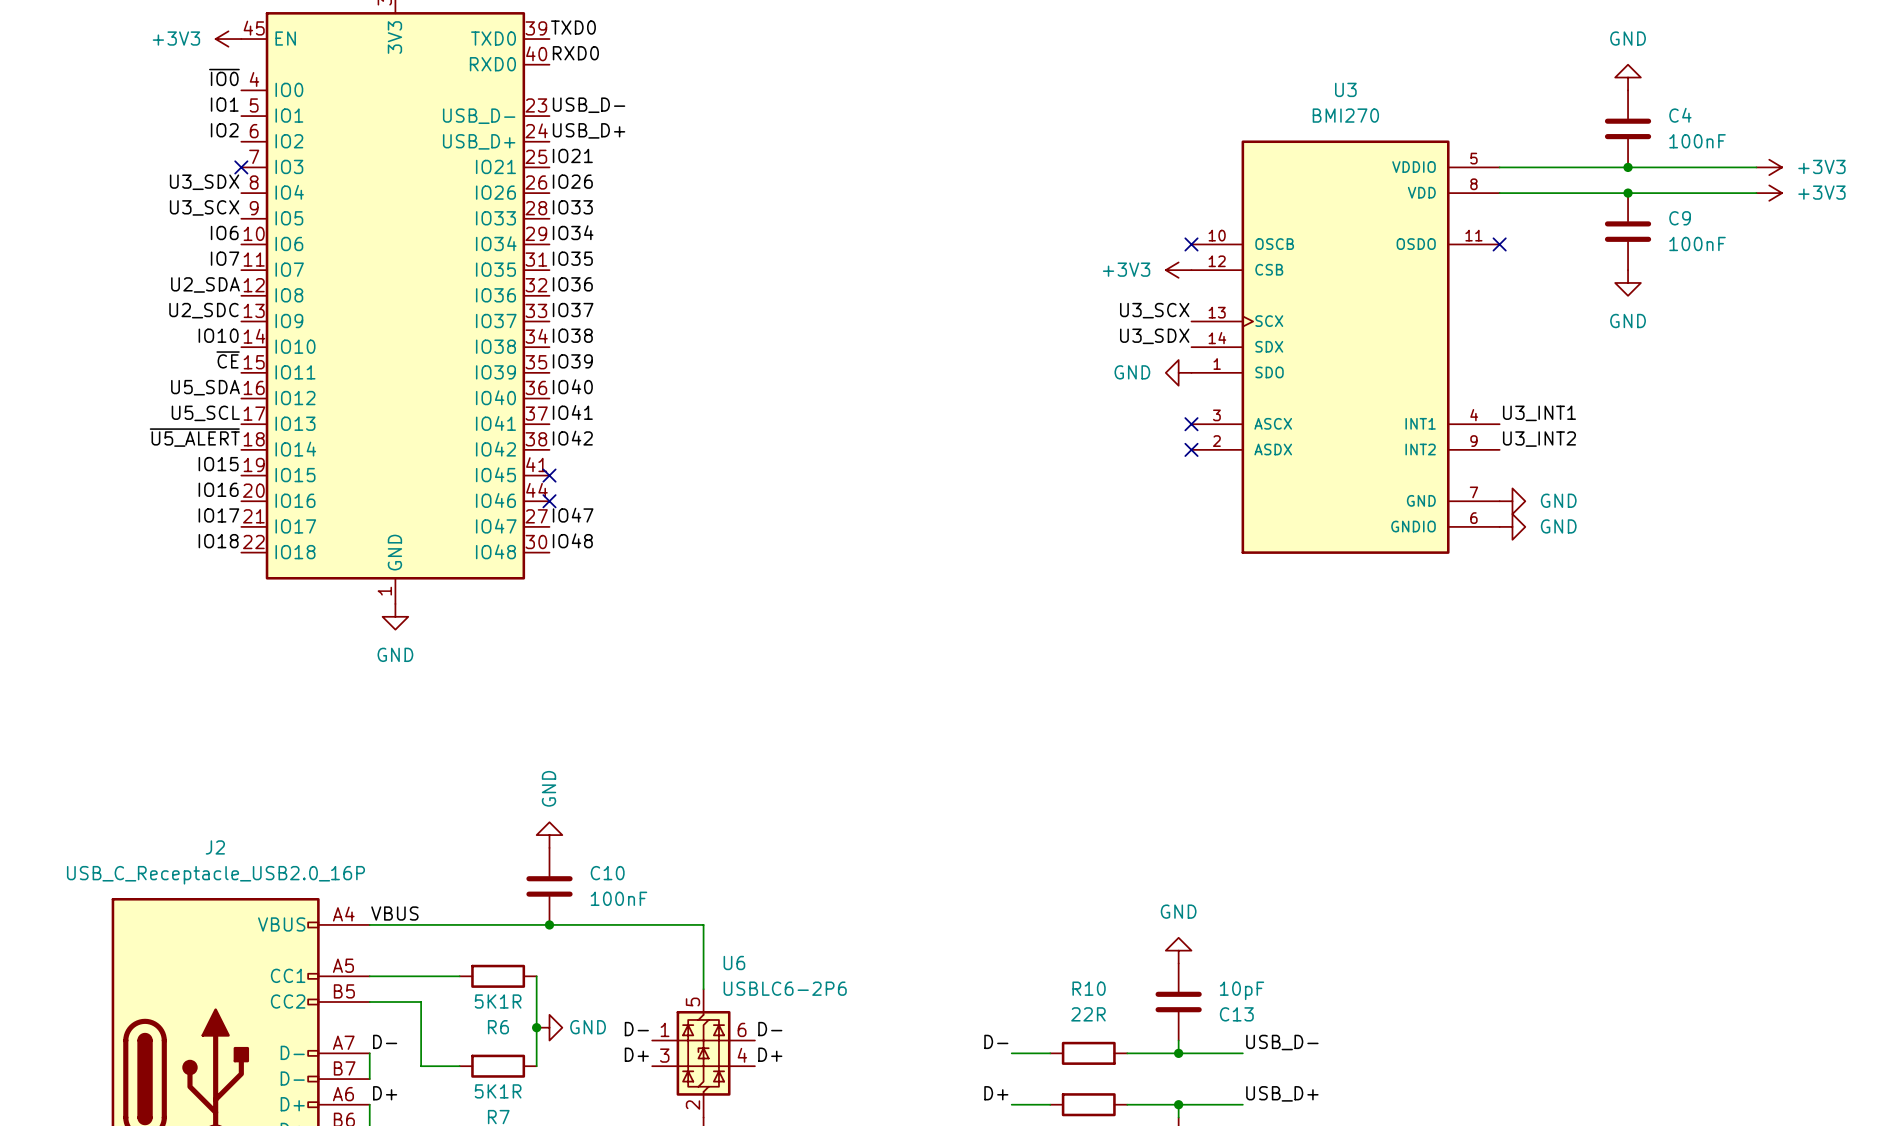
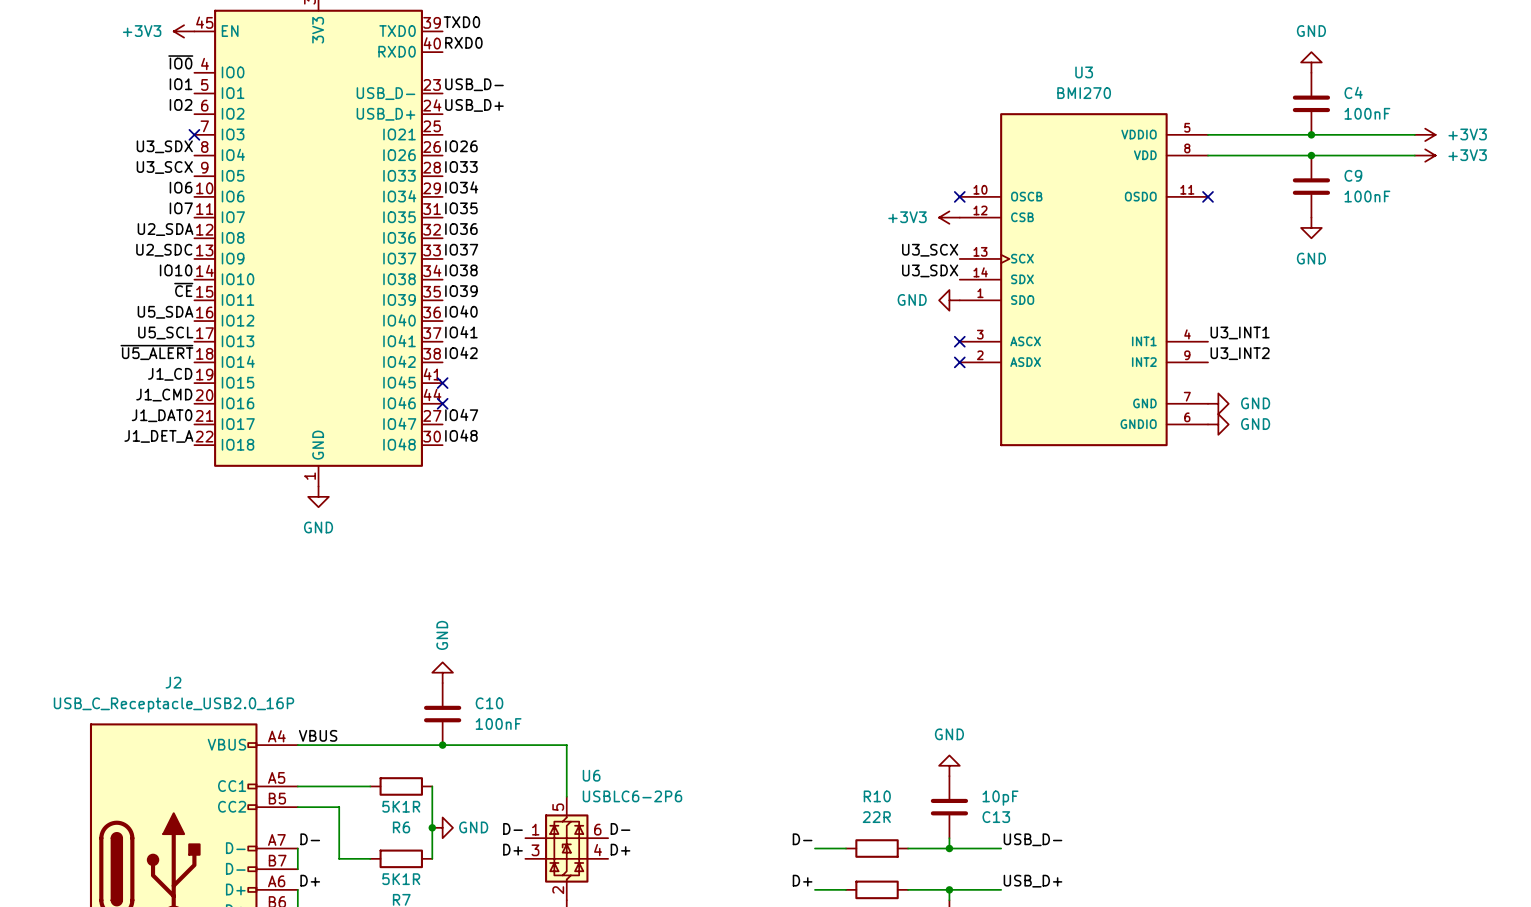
label: IO21 (572, 155) -> none
label: IO15 (218, 464) -> J1_CD (170, 374)
label: IO16 (218, 489) -> J1_CMD (164, 395)
label: IO17 (218, 515) -> J1_DAT0 (162, 415)
label: IO18 (218, 541) -> J1_DET_A (158, 436)

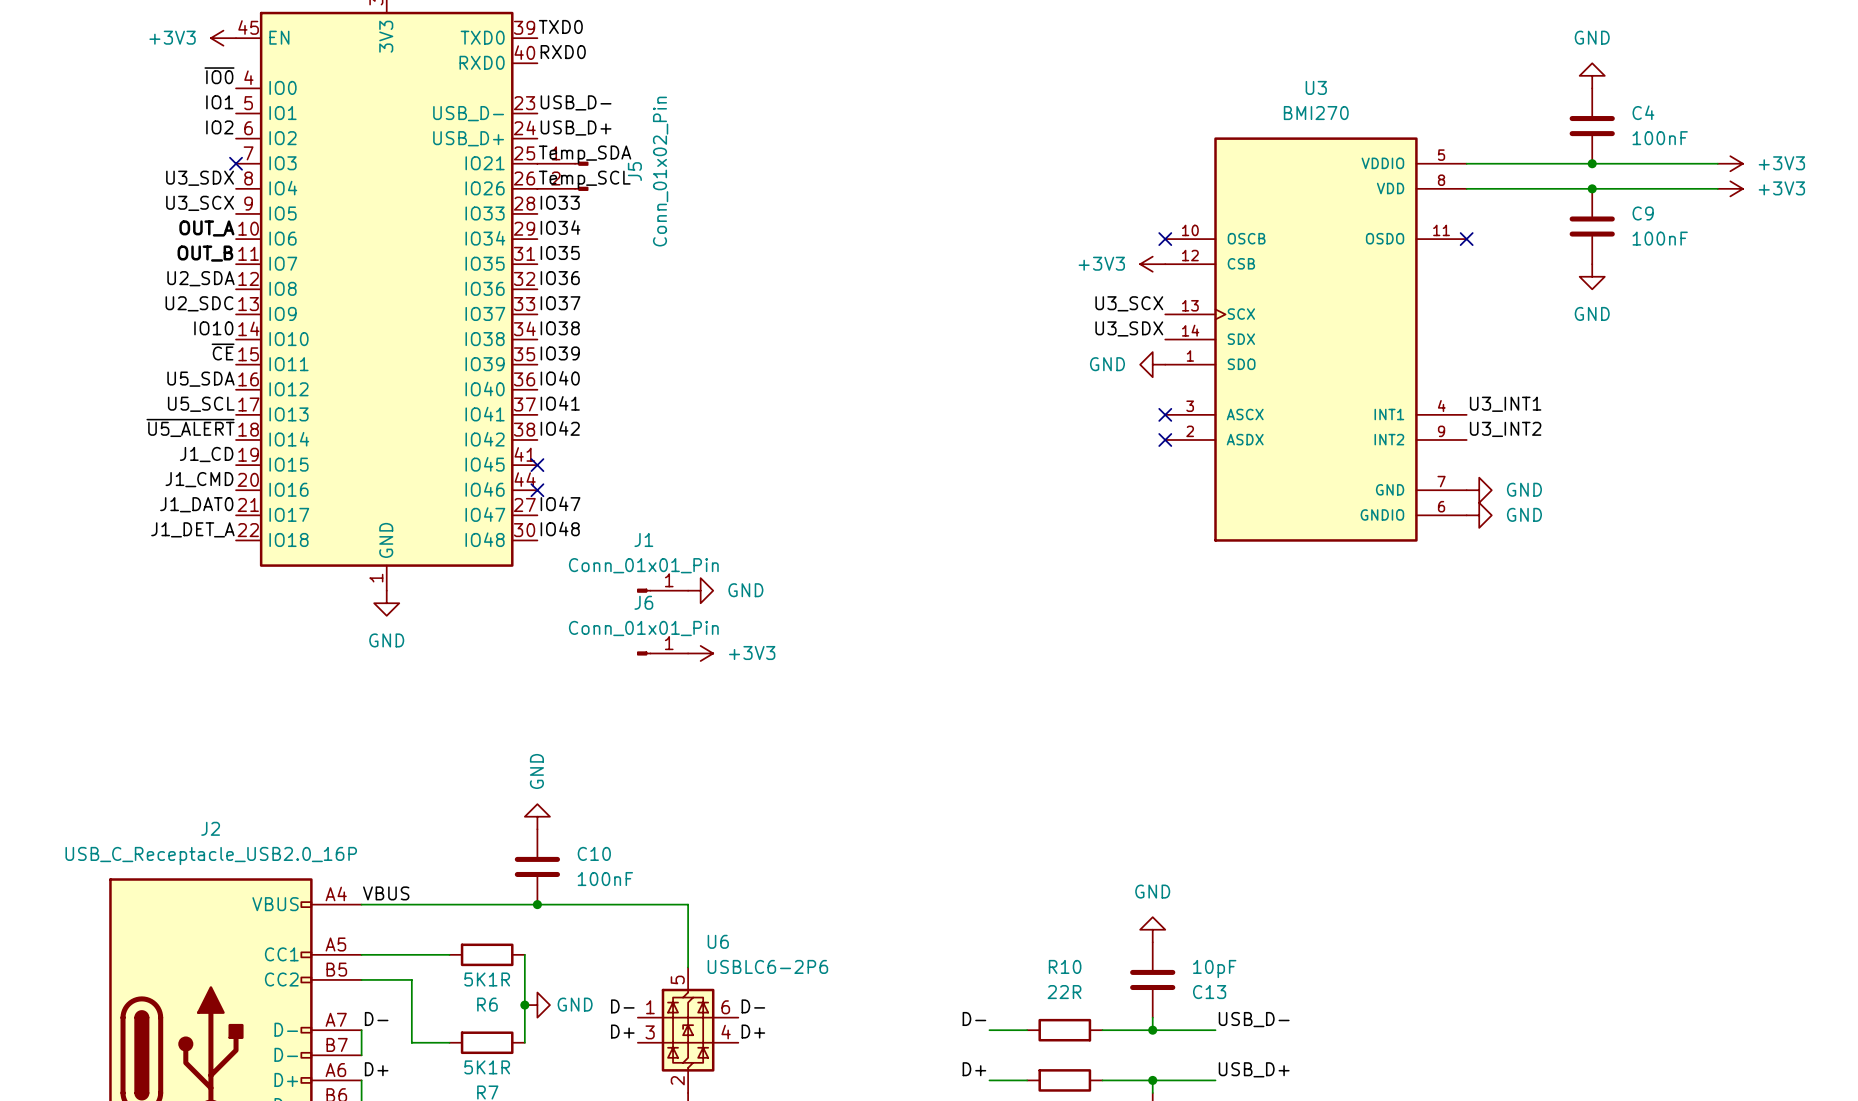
label: none -> Temp_SDA (585, 154)
J5: none -> Conn_01x02_Pin (562, 176)
label: IO26 (461, 146) -> Temp_SCL (584, 179)
label: IO6 (181, 187) -> OUT_A (206, 228)
label: IO7 (181, 208) -> OUT_B (205, 253)
J1: none -> Conn_01x01_Pin (662, 590)
power symbol: none -> GND (700, 590)
J6: none -> Conn_01x01_Pin (662, 653)
power symbol: none -> +3V3 (700, 653)

